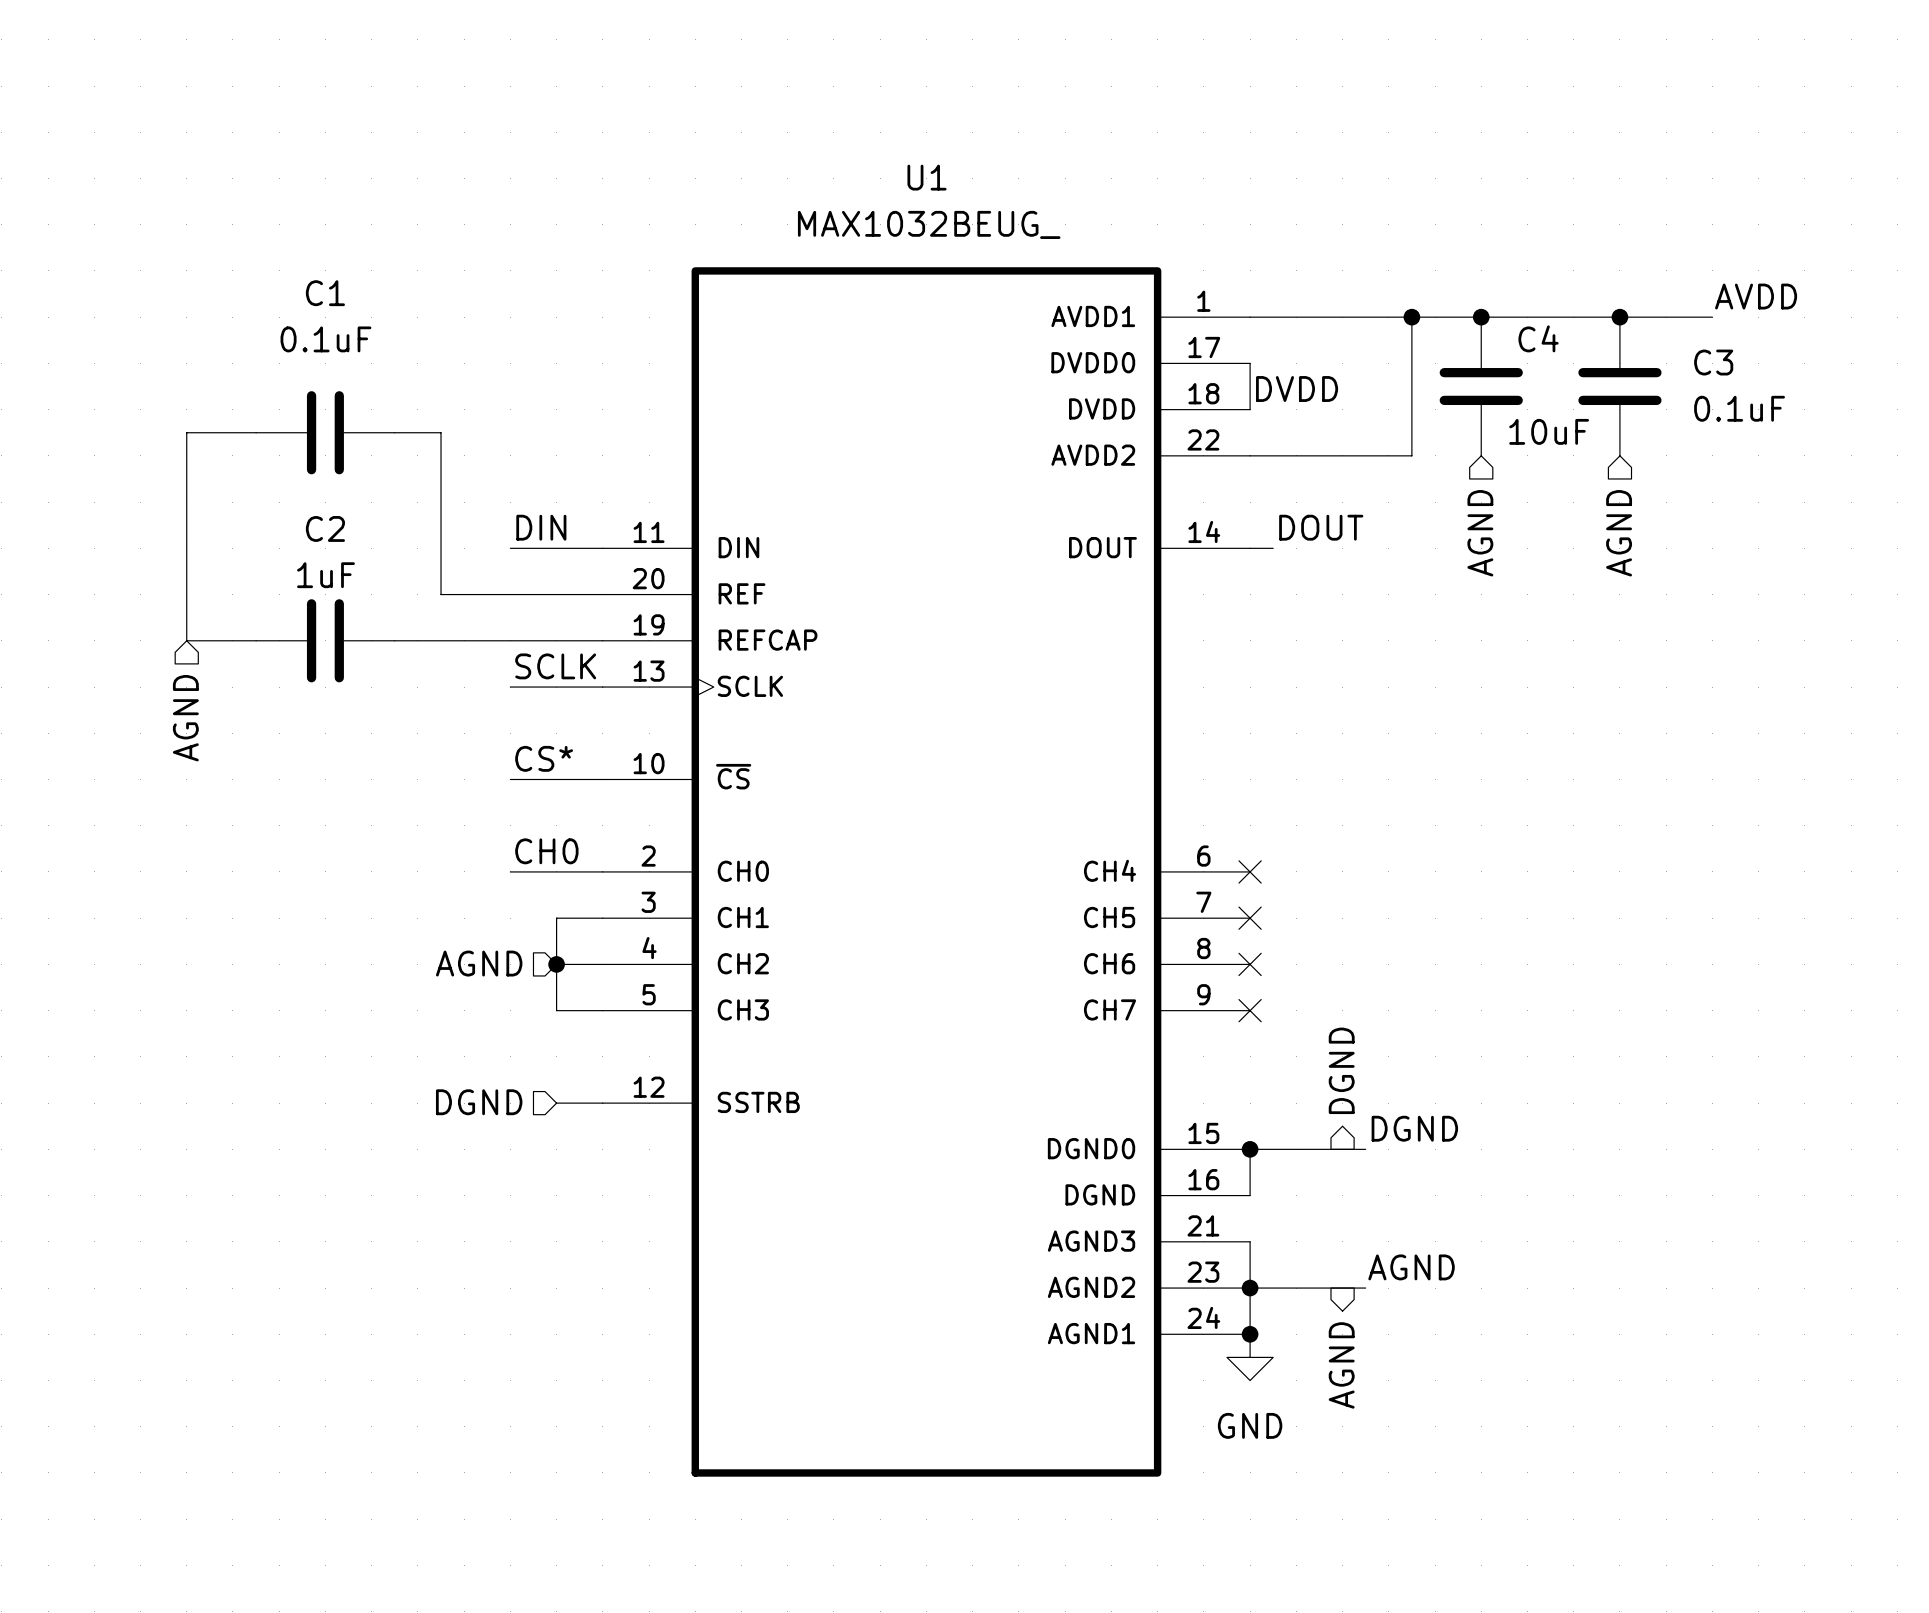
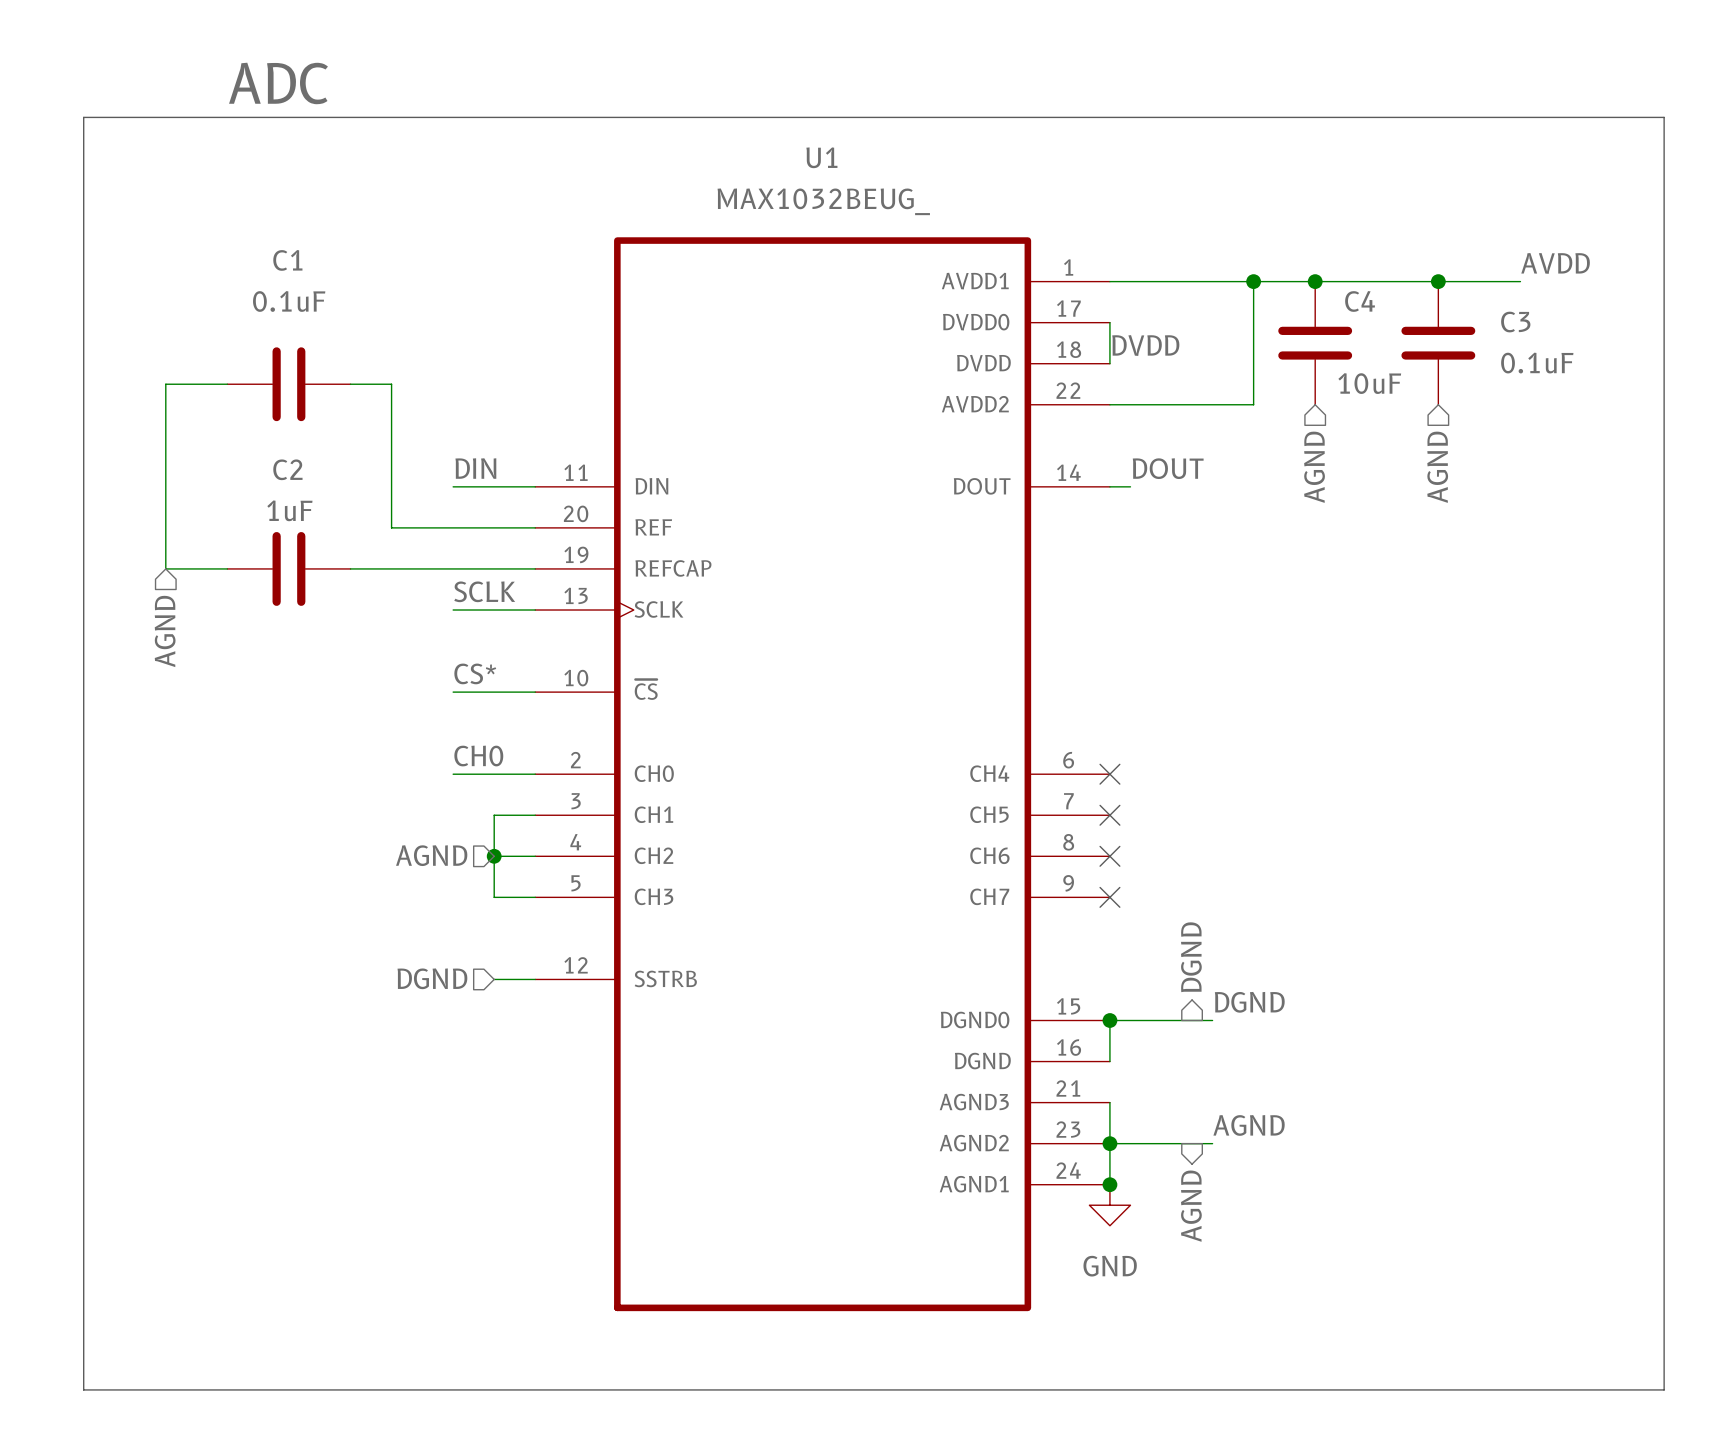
label: none -> ADC (278, 83)
line: none -> (83, 117) (1664, 117) (1664, 1389) (83, 1389) (83, 117)

